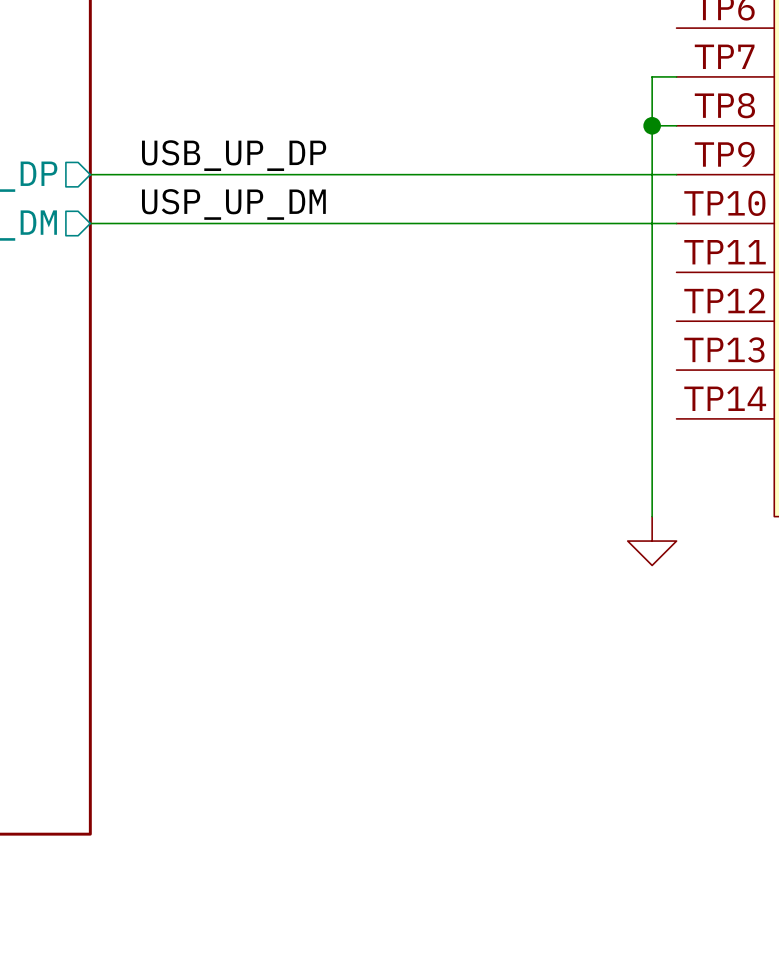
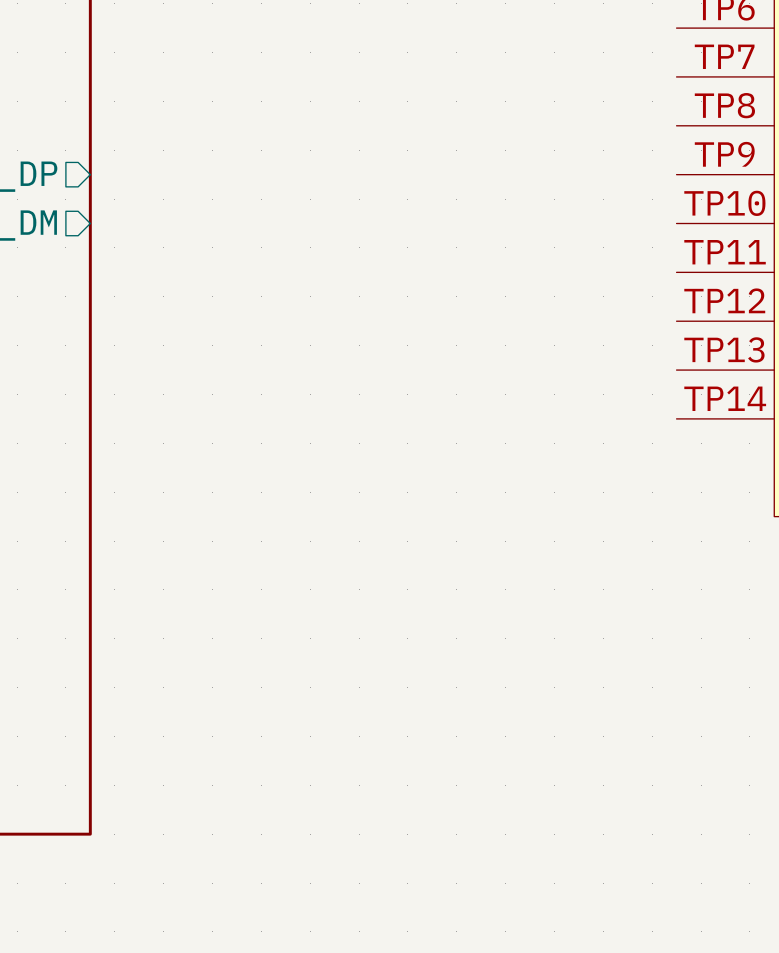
wire: (676, 76) (652, 76) (652, 516) -> none
wire: (652, 125) (676, 125) -> none
junction: (652, 125) -> none
label: USB_UP_DP (234, 155) -> none
wire: (90, 174) (676, 174) -> none
label: USP_UP_DM (233, 204) -> none
wire: (90, 223) (676, 223) -> none
power symbol: (652, 541) -> none

